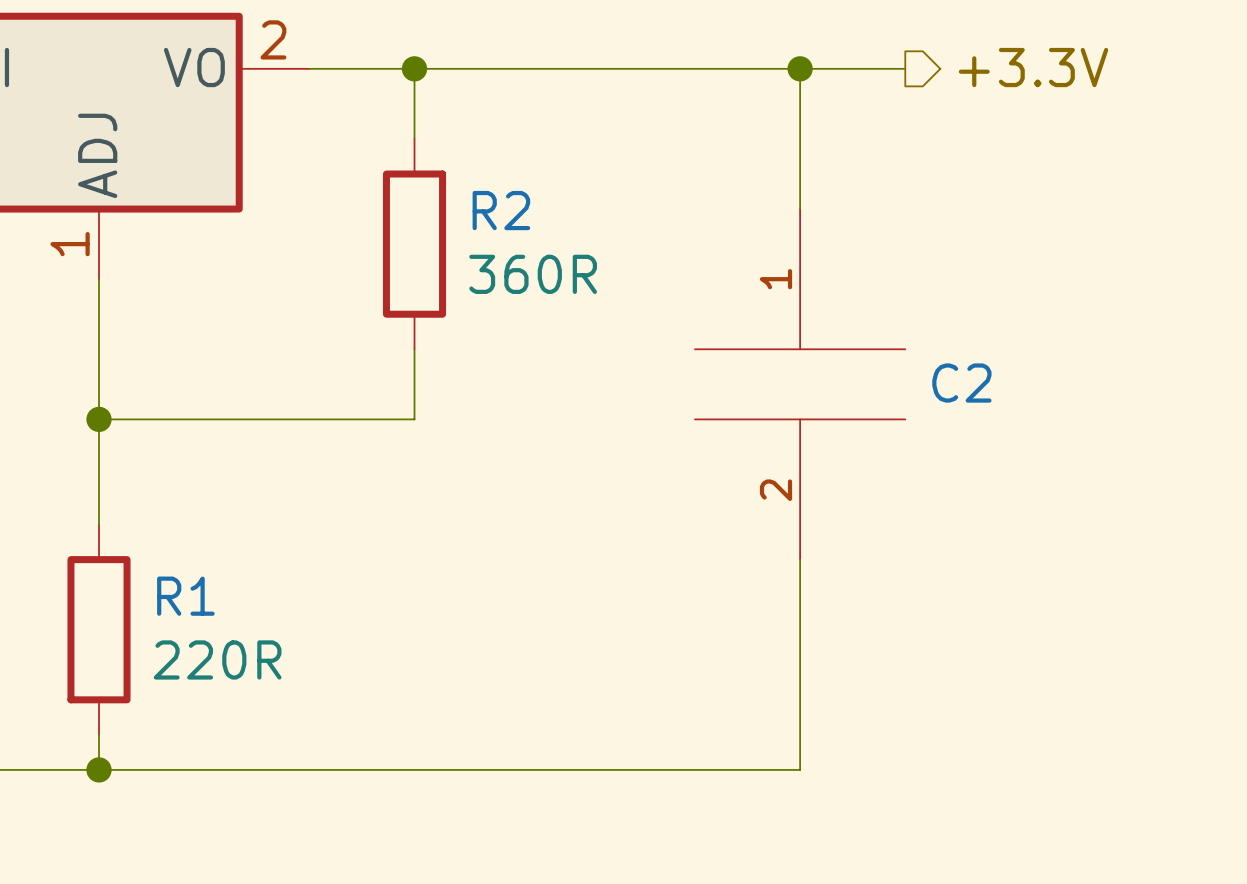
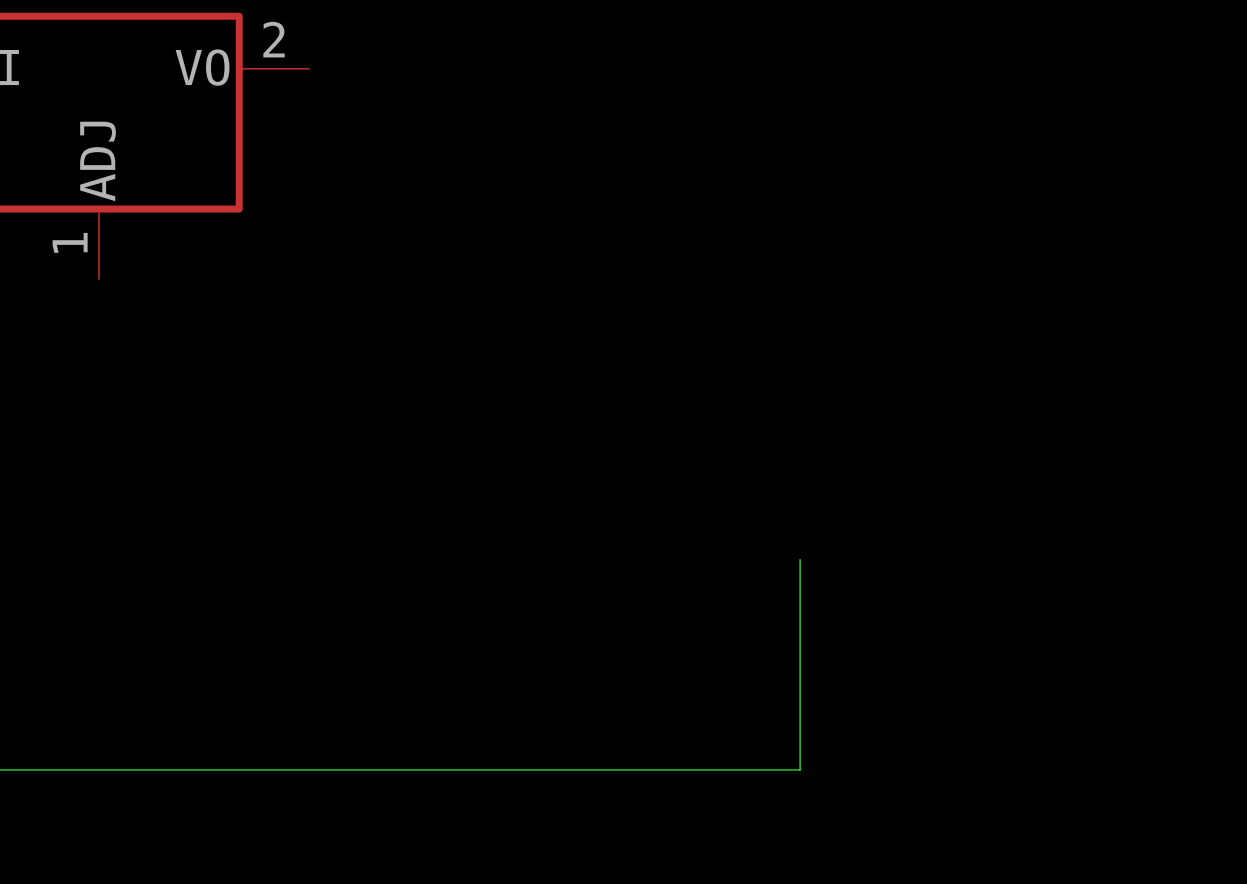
hierarchical label: +3.3V (1033, 67) -> none
wire: (309, 68) (905, 68) -> none
wire: (414, 68) (414, 138) -> none
junction: (414, 68) -> none
wire: (800, 68) (800, 209) -> none
junction: (800, 68) -> none
R2: 360R (414, 244) -> none
wire: (99, 279) (99, 524) -> none
wire: (414, 349) (414, 419) (99, 419) -> none
C2: (800, 384) -> none
junction: (99, 419) -> none
R1: 220R (99, 629) -> none
wire: (99, 734) (99, 769) -> none
junction: (99, 769) -> none

